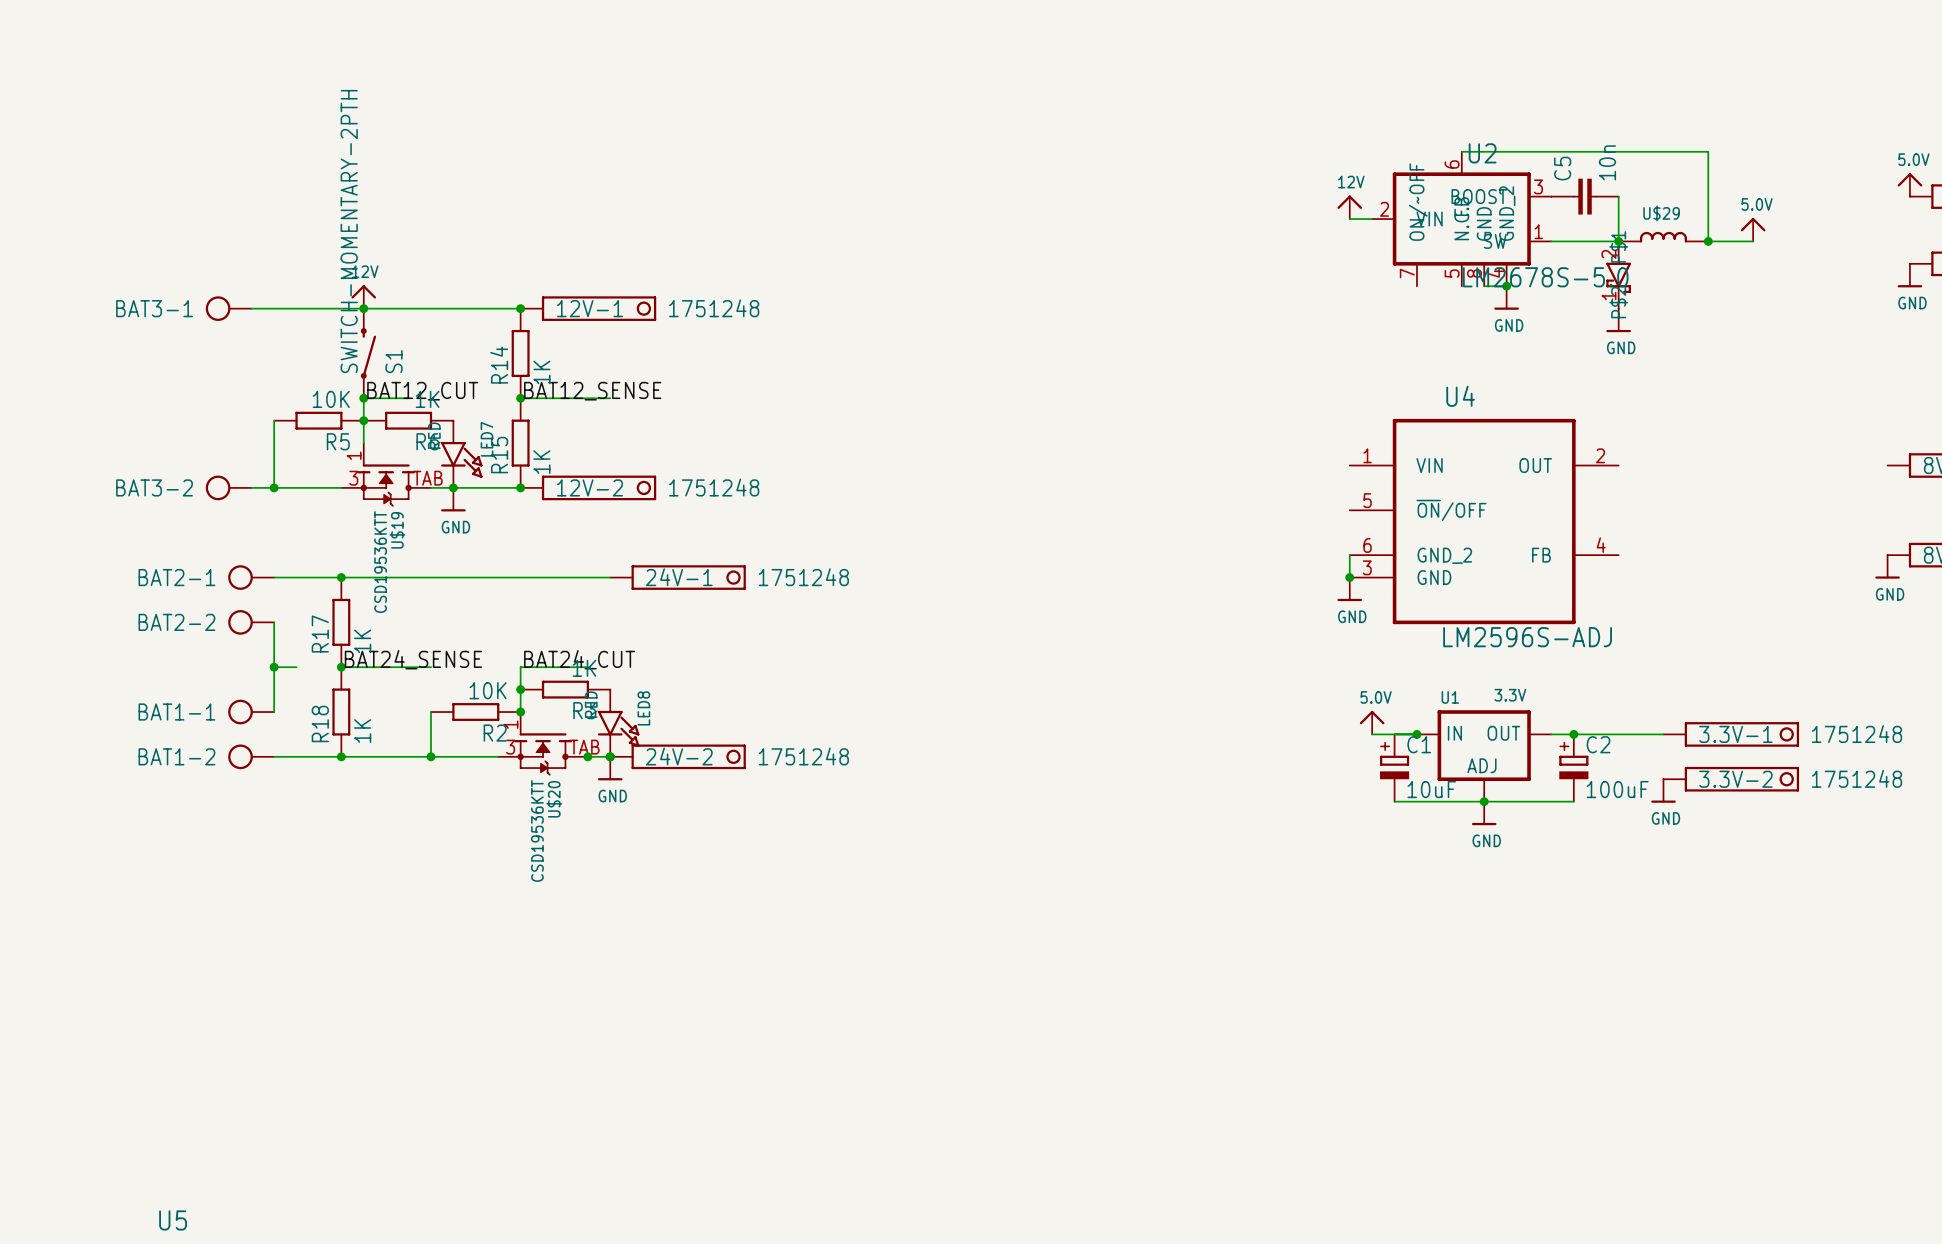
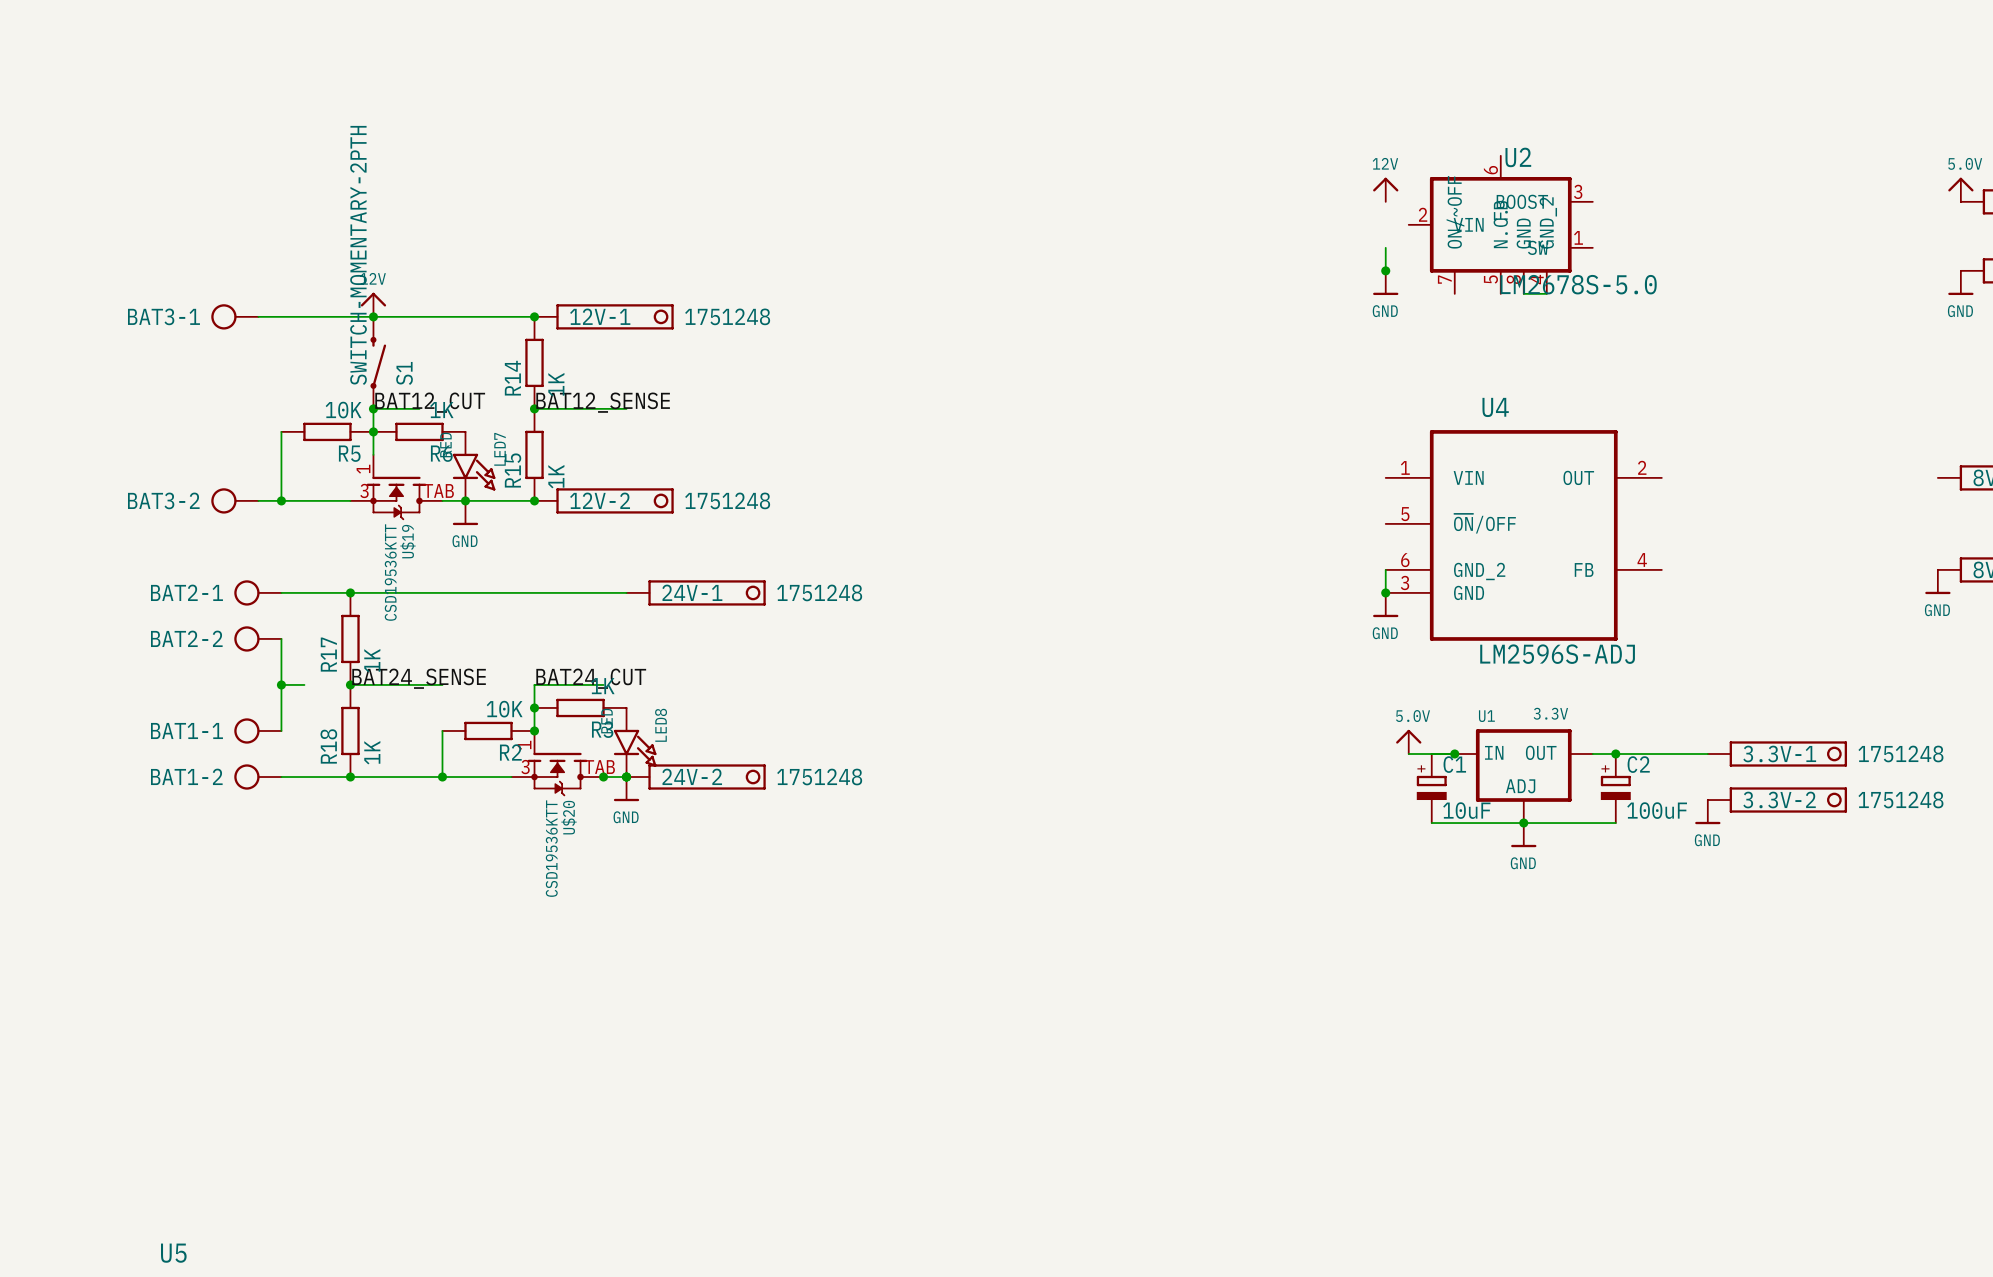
wire: (1461, 151) (1708, 151) (1708, 241) (1753, 241) -> none
C5: 10n (1585, 196) -> none
wire: (1618, 196) (1618, 241) (1551, 241) -> none
power symbol position: 12V (1349, 207) -> 12V (1385, 189)
wire: (1349, 219) (1372, 219) -> none
power symbol: 5.0V (1753, 229) -> none
U$29: (1663, 237) -> none
wire: none -> (1385, 247) (1385, 270)
junction: (1618, 241) -> none
junction: (1708, 241) -> none
junction: none -> (1385, 270)
power symbol: none -> GND (1385, 282)
part: (1618, 275) -> none
junction: (1506, 286) -> none
power symbol: GND (1506, 298) -> none
power symbol: GND (1618, 320) -> none

